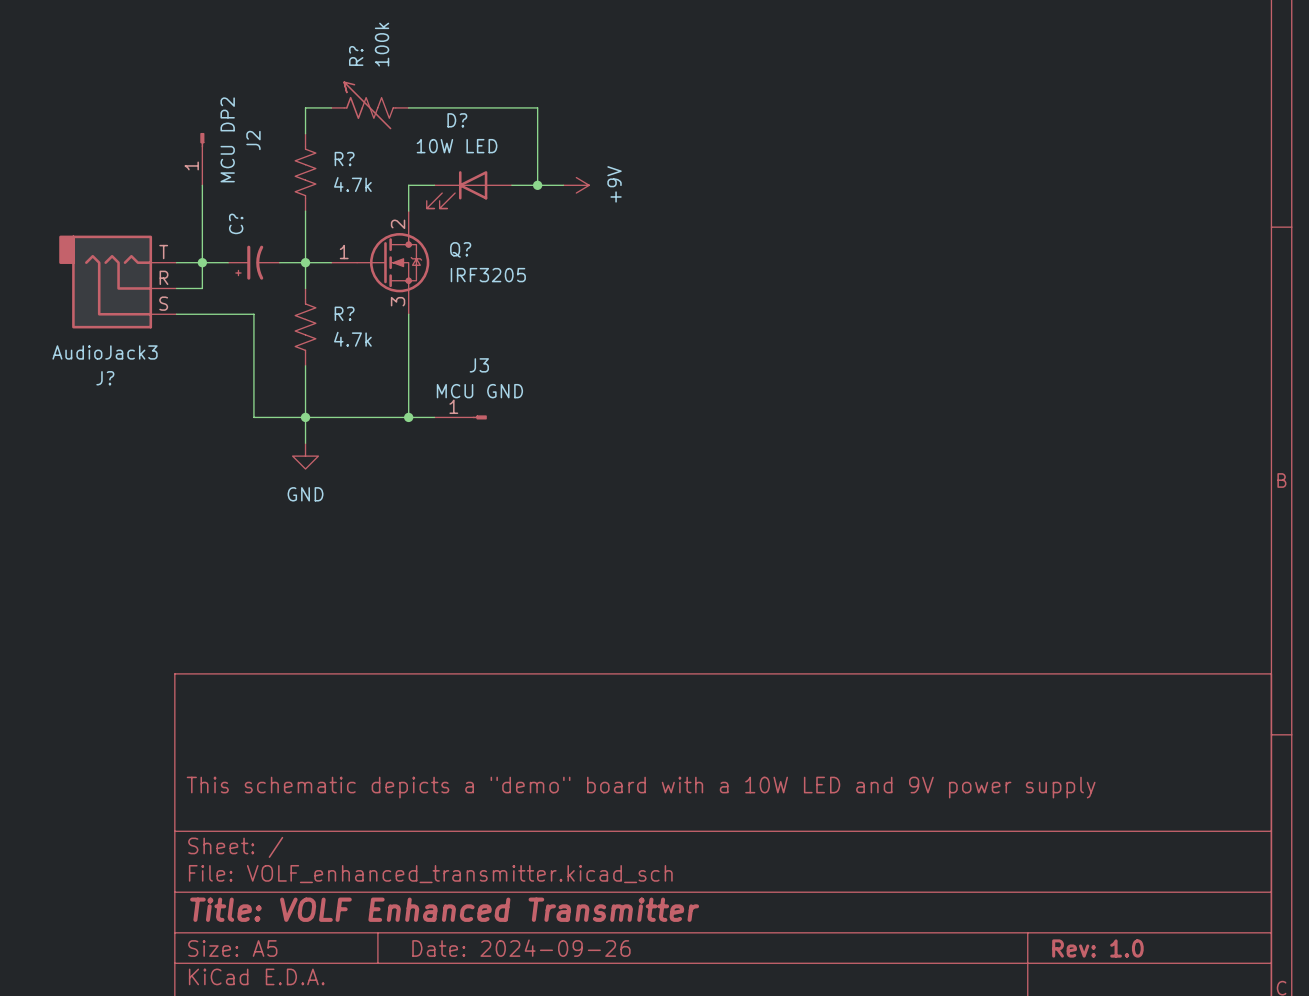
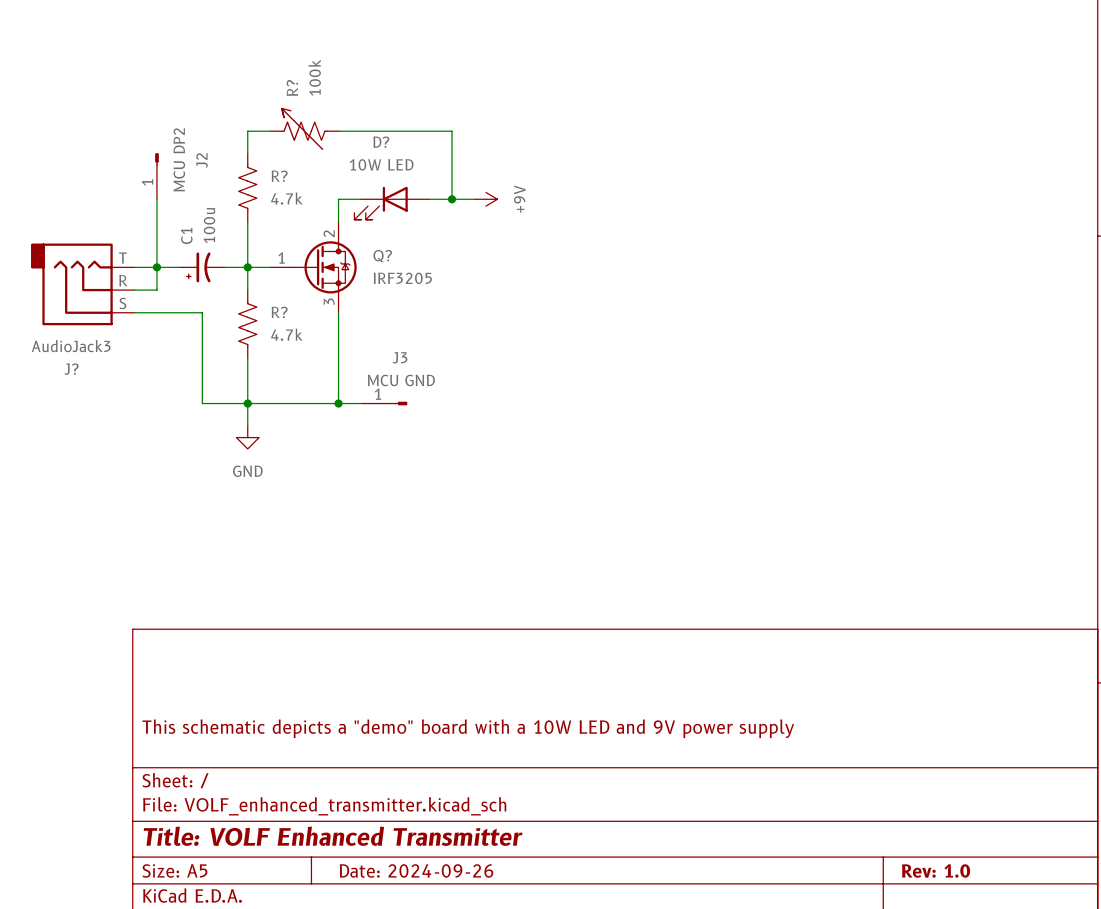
C? value: none -> 100u (209, 225)
C? name: C? (236, 223) -> C1 (186, 235)

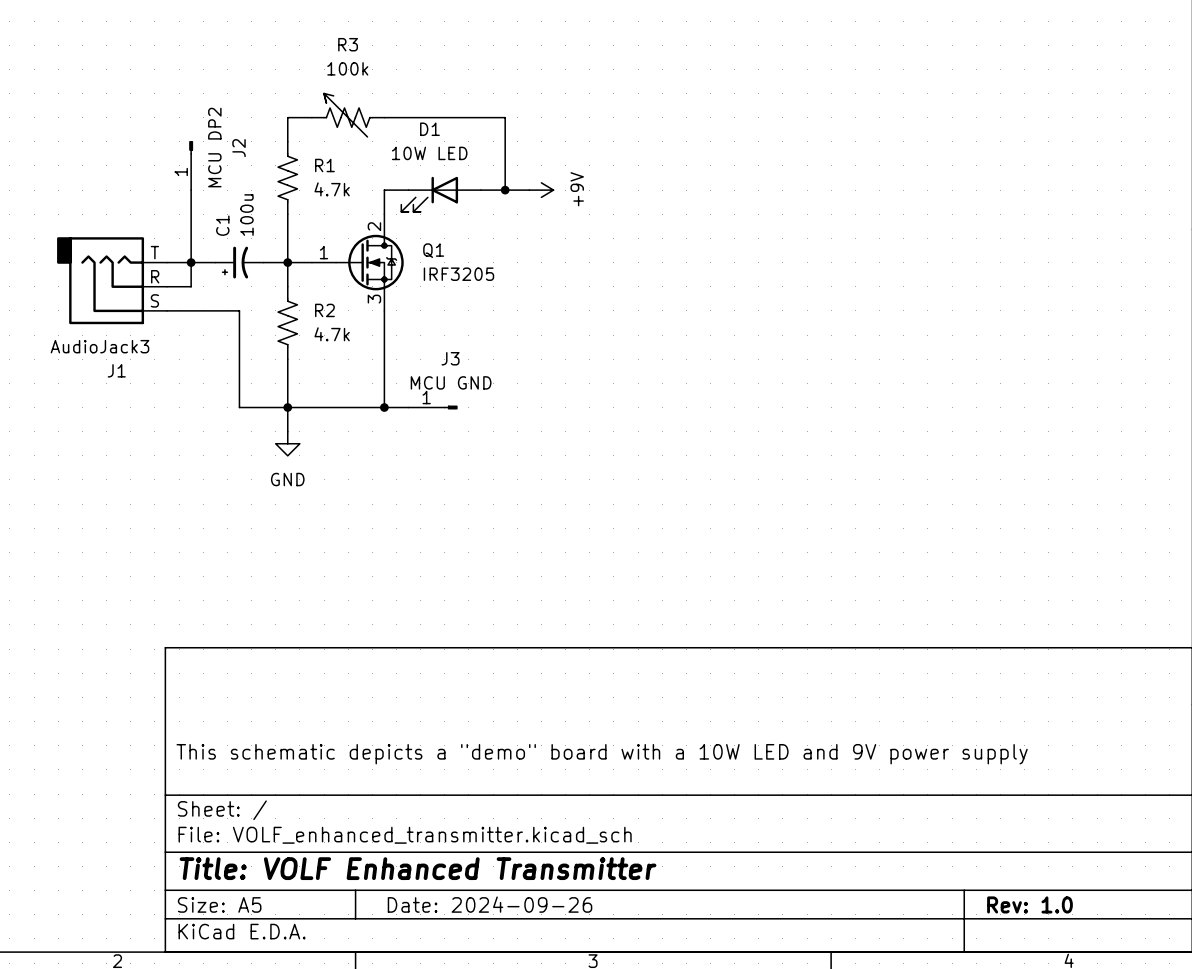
R? value rotation: 0° (314, 77) -> 90° clockwise (347, 68)
R? name: R? (292, 88) -> R3 (348, 44)
D? name: D? (381, 142) -> D1 (429, 129)
R? name: R? (279, 176) -> R1 (324, 165)
Q? name: Q? (382, 256) -> Q1 (433, 250)
R? name: R? (279, 312) -> R2 (324, 310)
J? name: J? (71, 369) -> J1 (116, 370)

